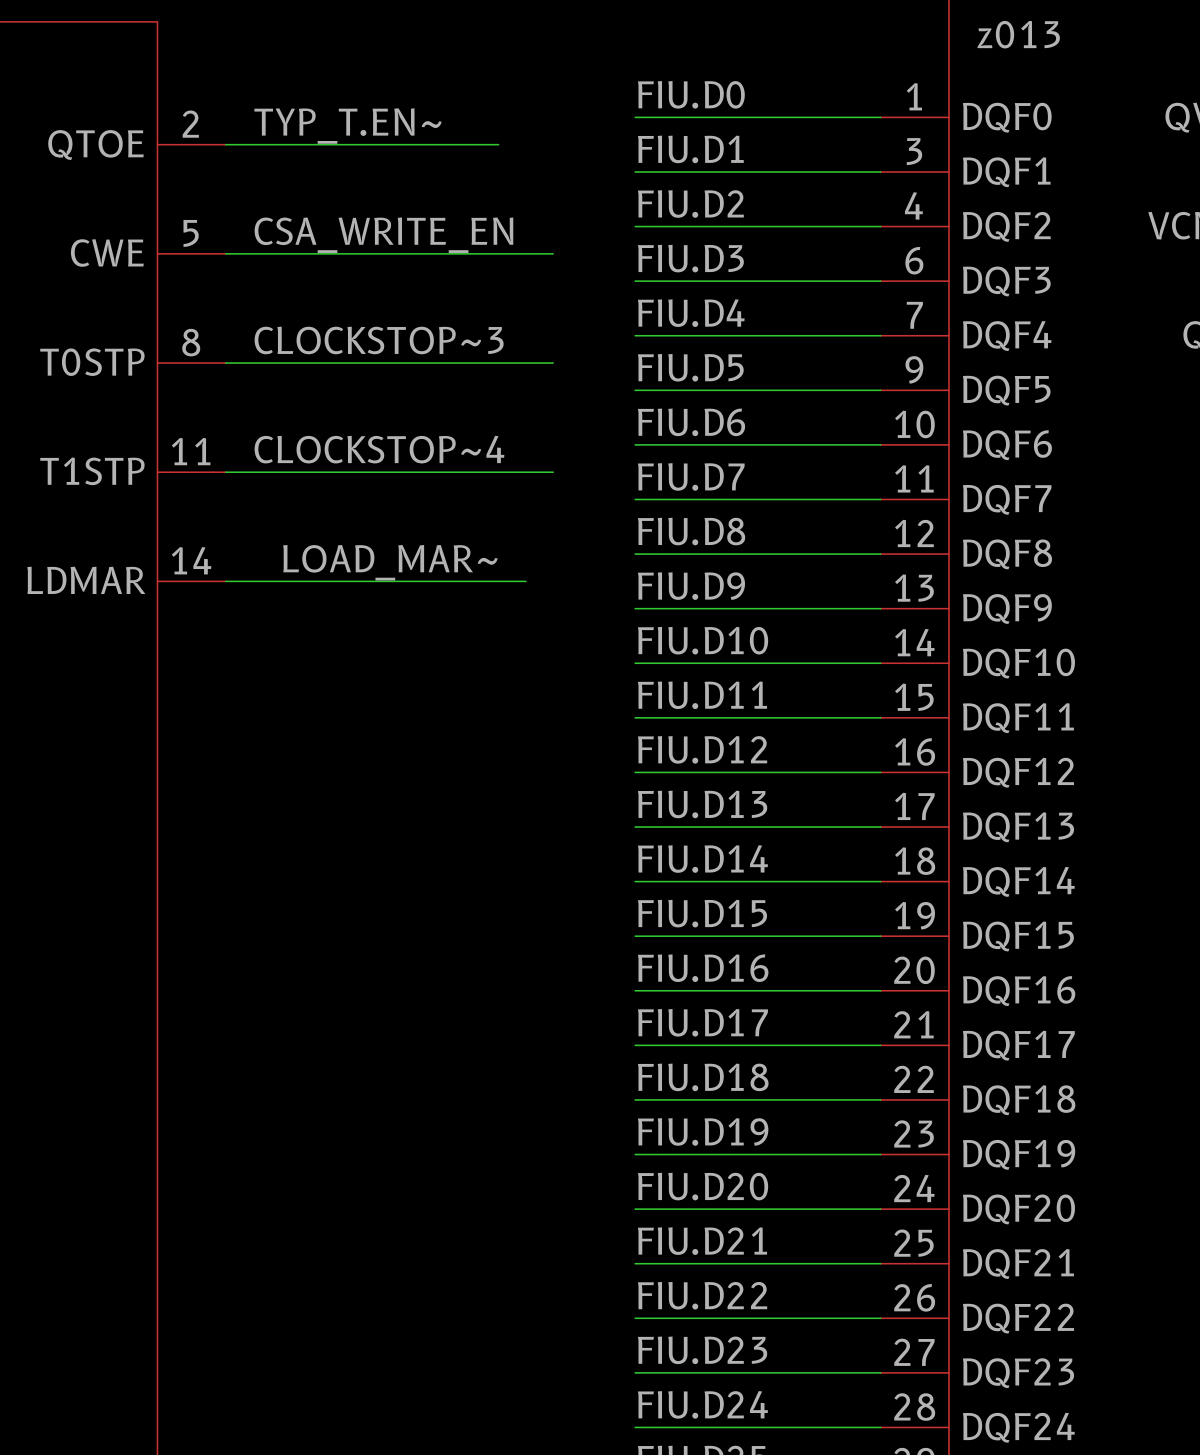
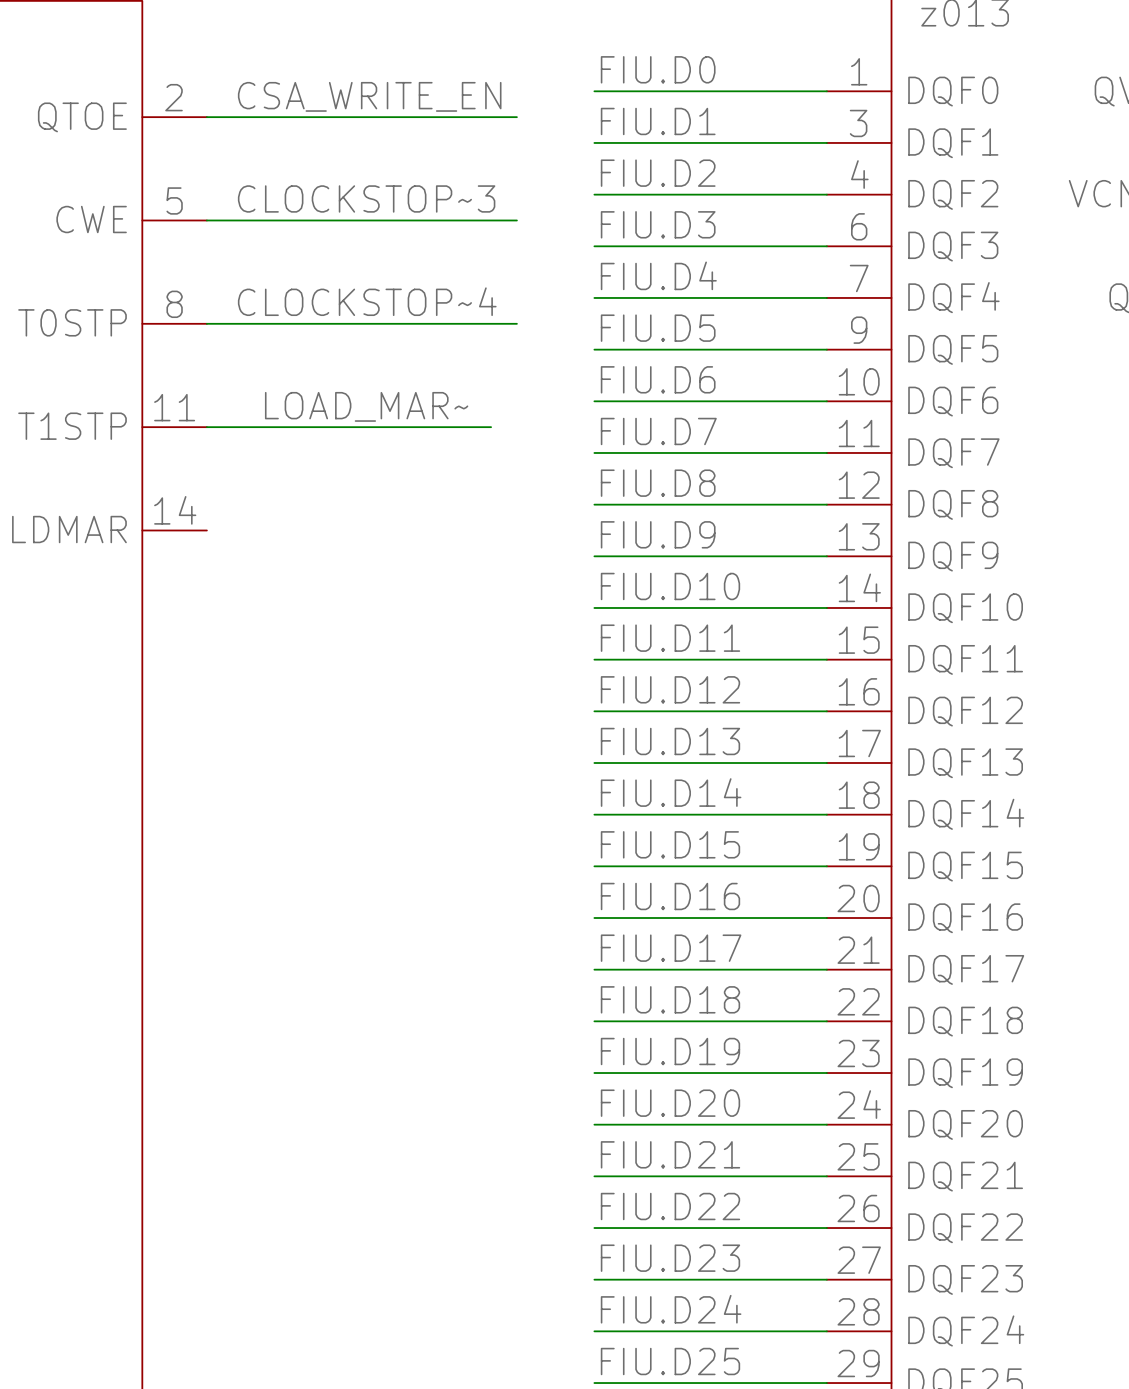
label: TYP_T.EN~ (348, 126) -> CSA_WRITE_EN (369, 96)
wire: none -> (465, 117) (516, 117)
label: CSA_WRITE_EN (383, 235) -> CLOCKSTOP~3 (366, 198)
label: CLOCKSTOP~3 (379, 340) -> CLOCKSTOP~4 (367, 301)
label: CLOCKSTOP~4 (379, 449) -> none
wire: (525, 472) (553, 472) -> none
label position: LOAD_MAR~ (390, 562) -> LOAD_MAR~ (366, 406)
wire: (225, 581) (525, 581) -> none

